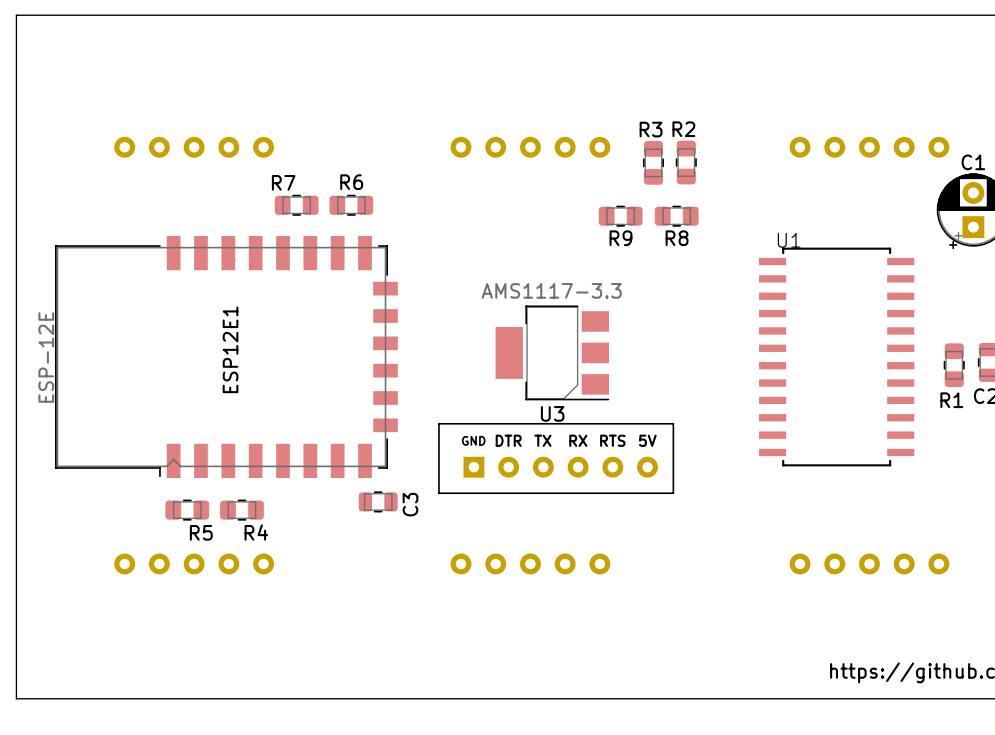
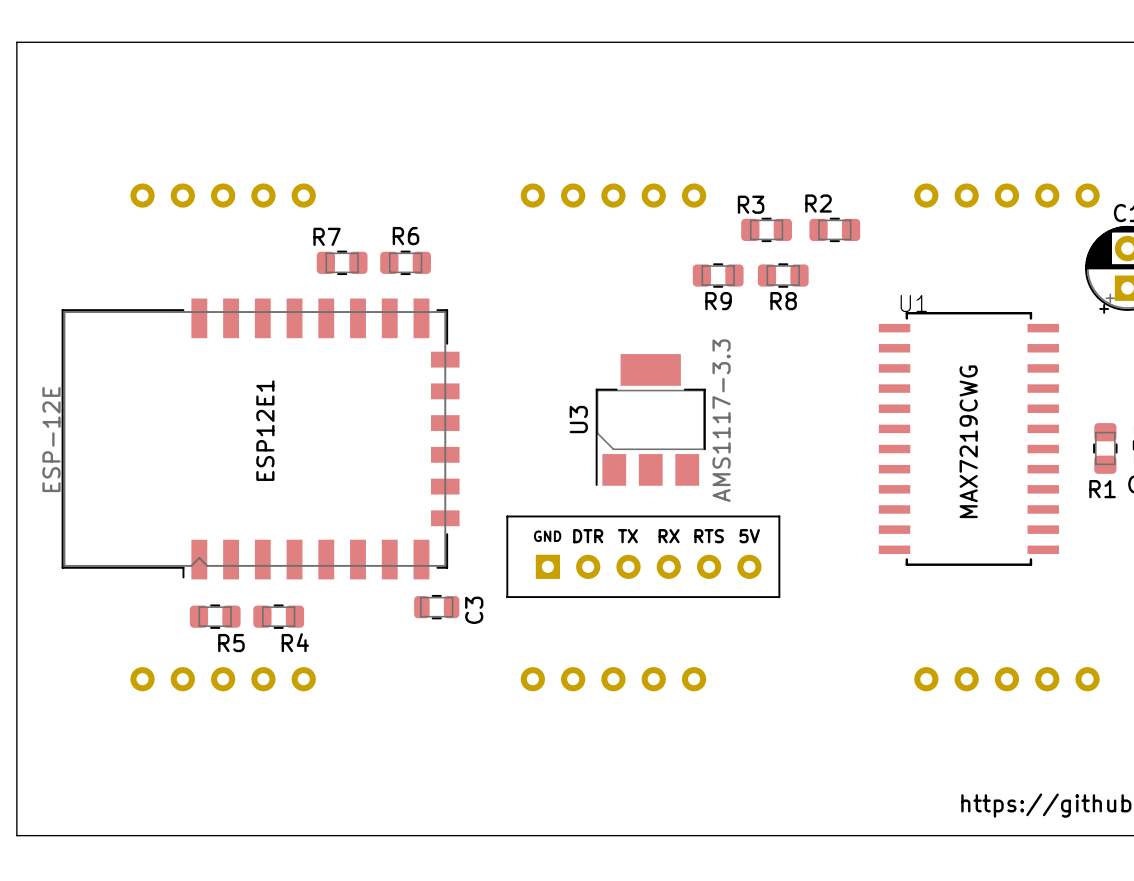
R3 rotation: 0° (653, 162) -> 90° clockwise (766, 229)
R2 rotation: 0° (686, 162) -> 90° clockwise (834, 229)
R2 position: (686, 162) -> (834, 229)
U3 rotation: 0° (552, 352) -> 90° clockwise (650, 420)
text: none -> MAX7219CWG (968, 441)

